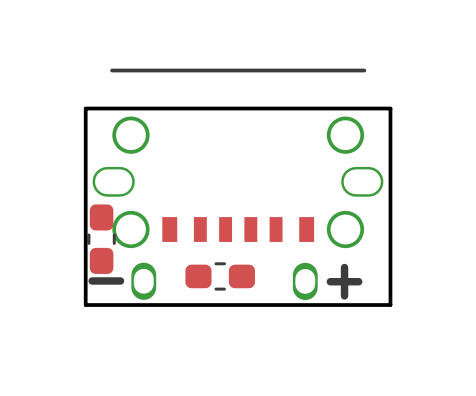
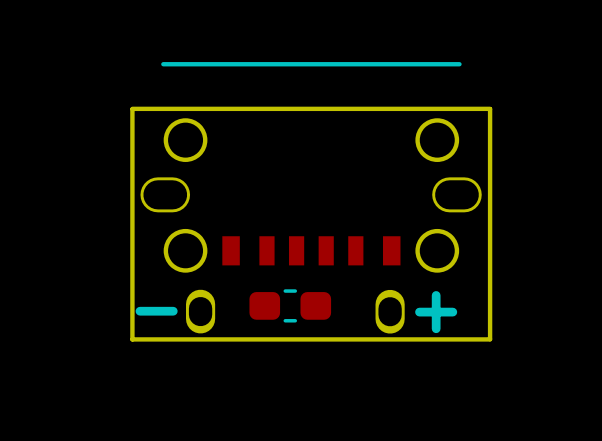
part: (101, 239) -> none

